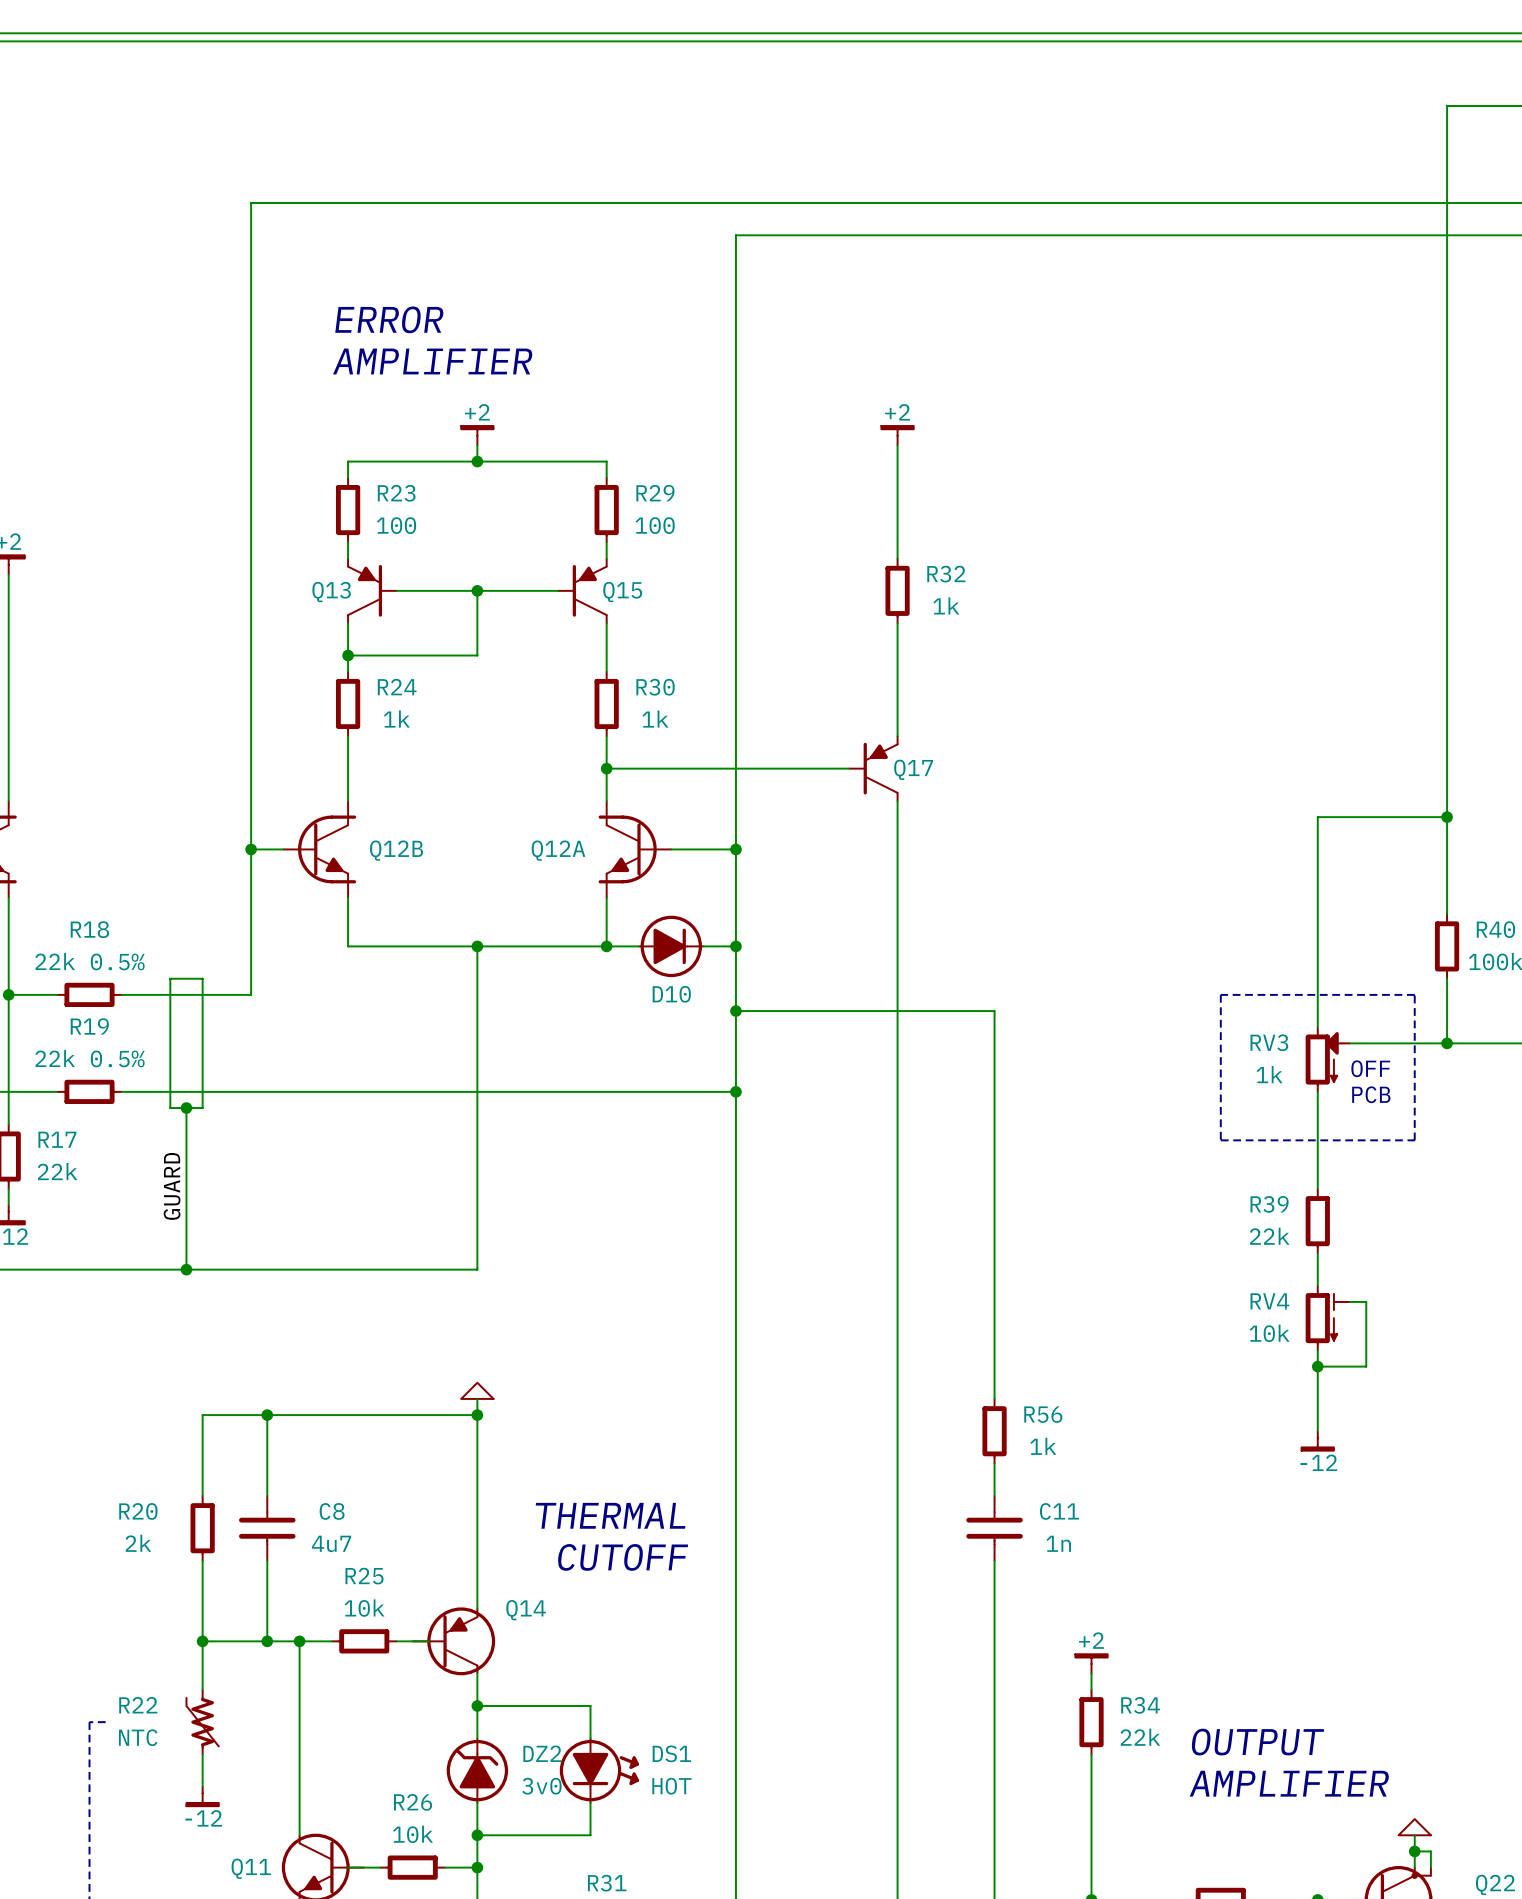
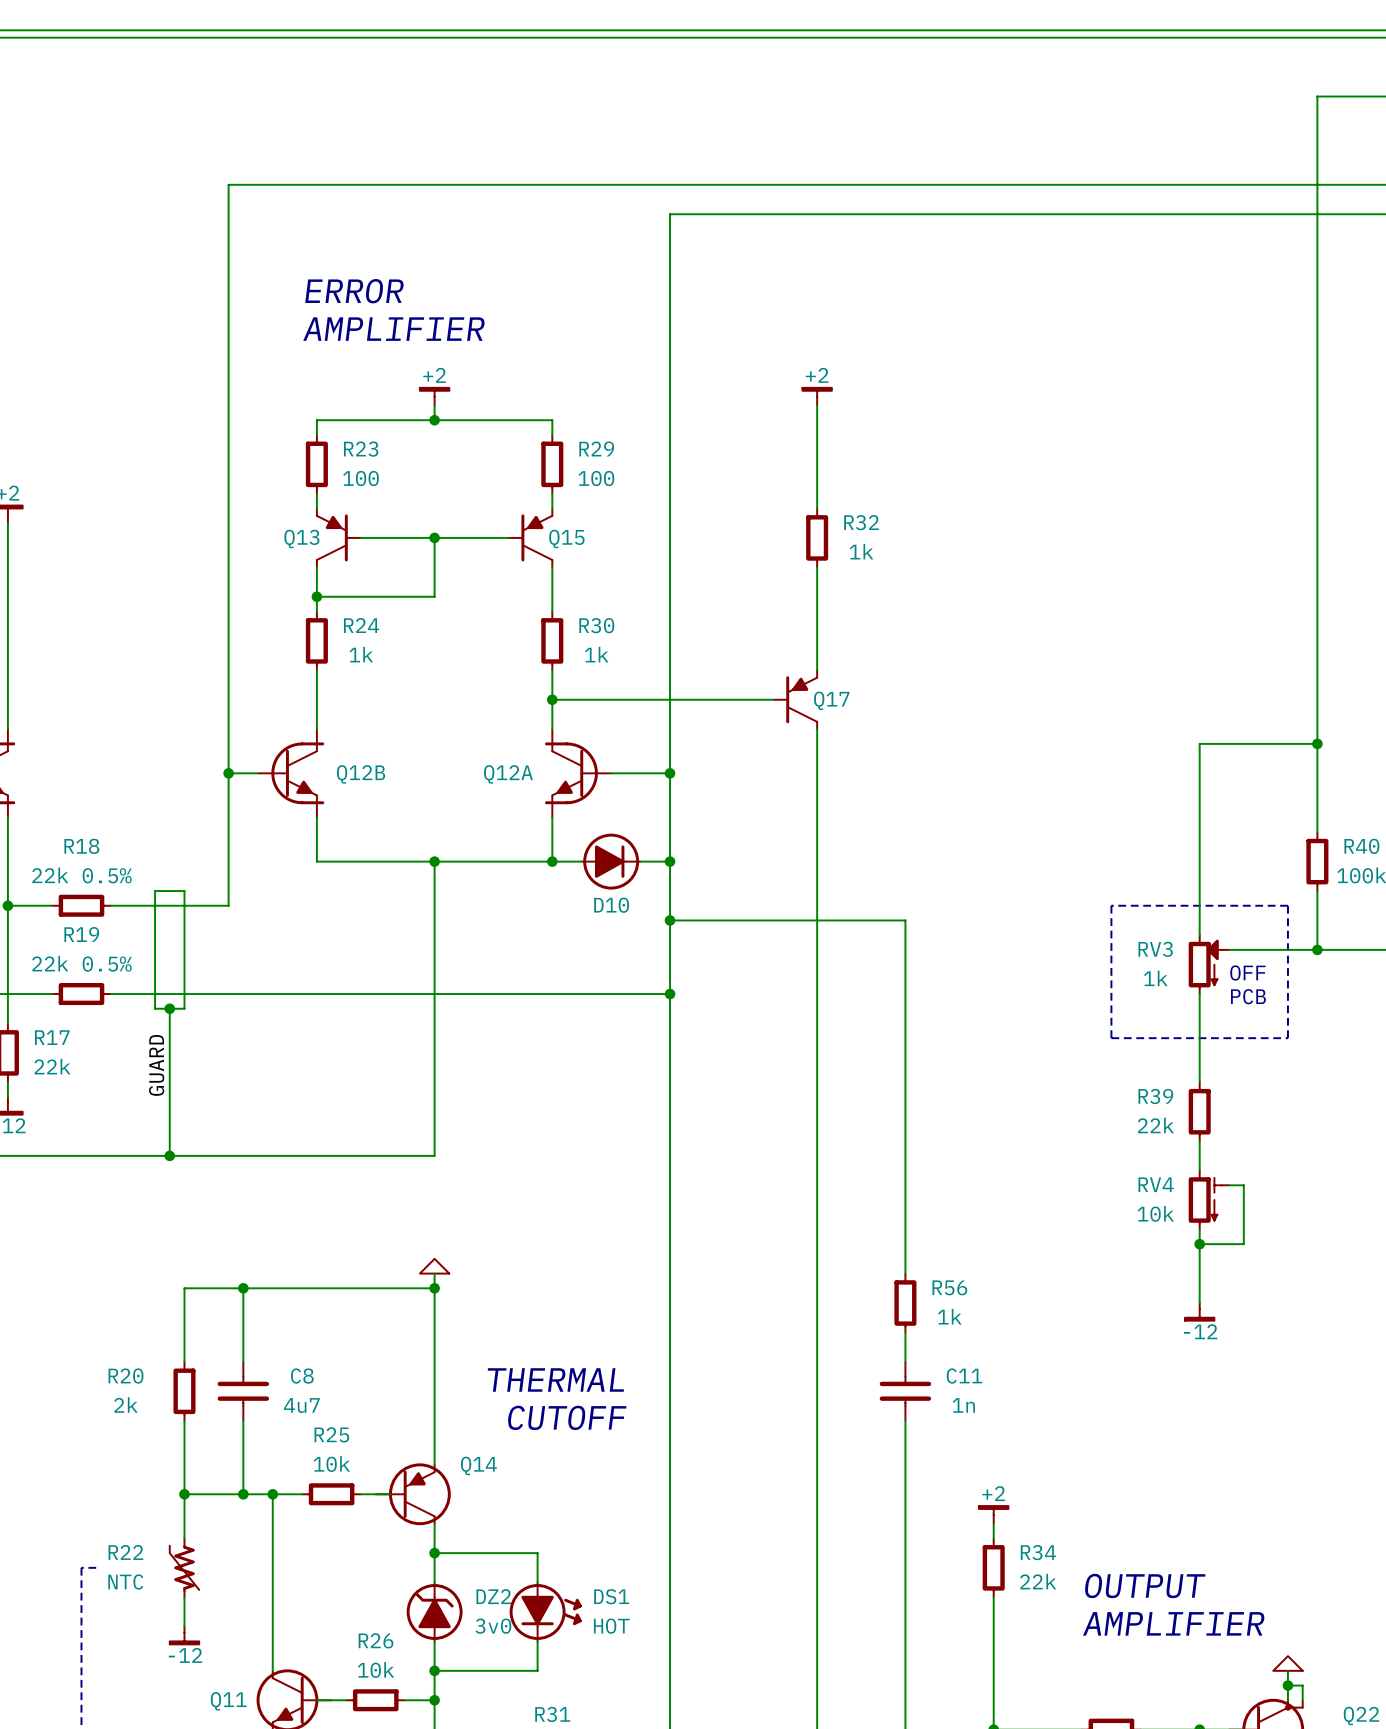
label position: GUARD (172, 1186) -> GUARD (156, 1065)

